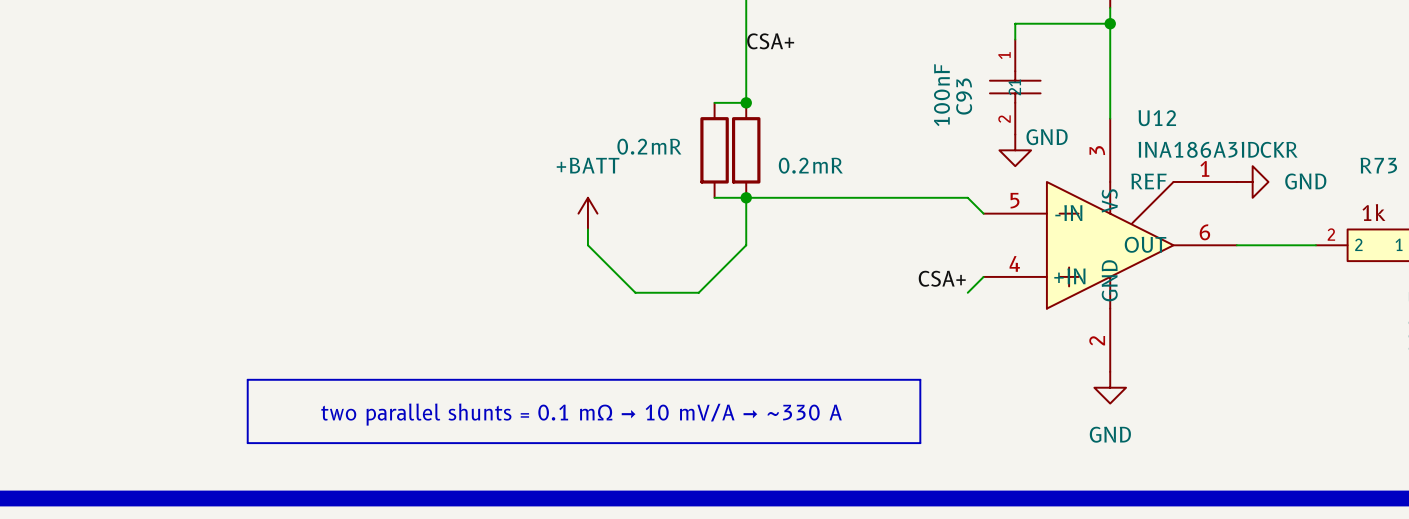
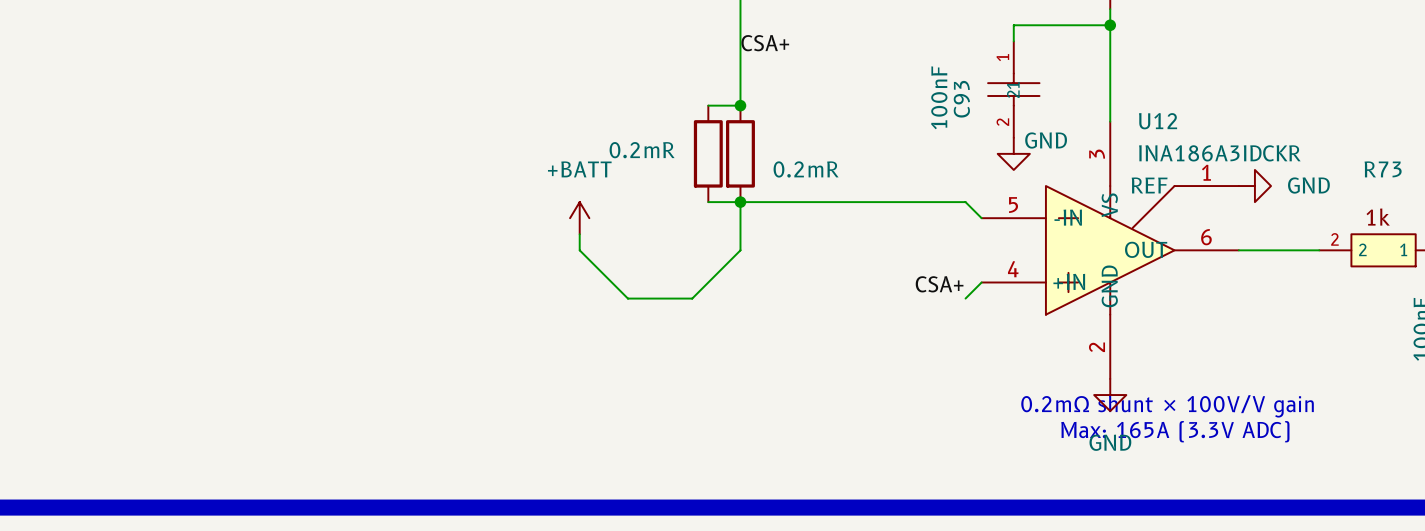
line: (247, 379) (920, 379) (920, 443) (247, 443) (247, 379) -> none
text: none -> 0.2mΩ shunt × 100V/V gain (1167, 406)
text: two parallel shunts = 0.1 mΩ → 10 mV/A → ~330 A (581, 414) -> none
text: none -> Max: 165A (3.3V ADC) (1175, 431)

